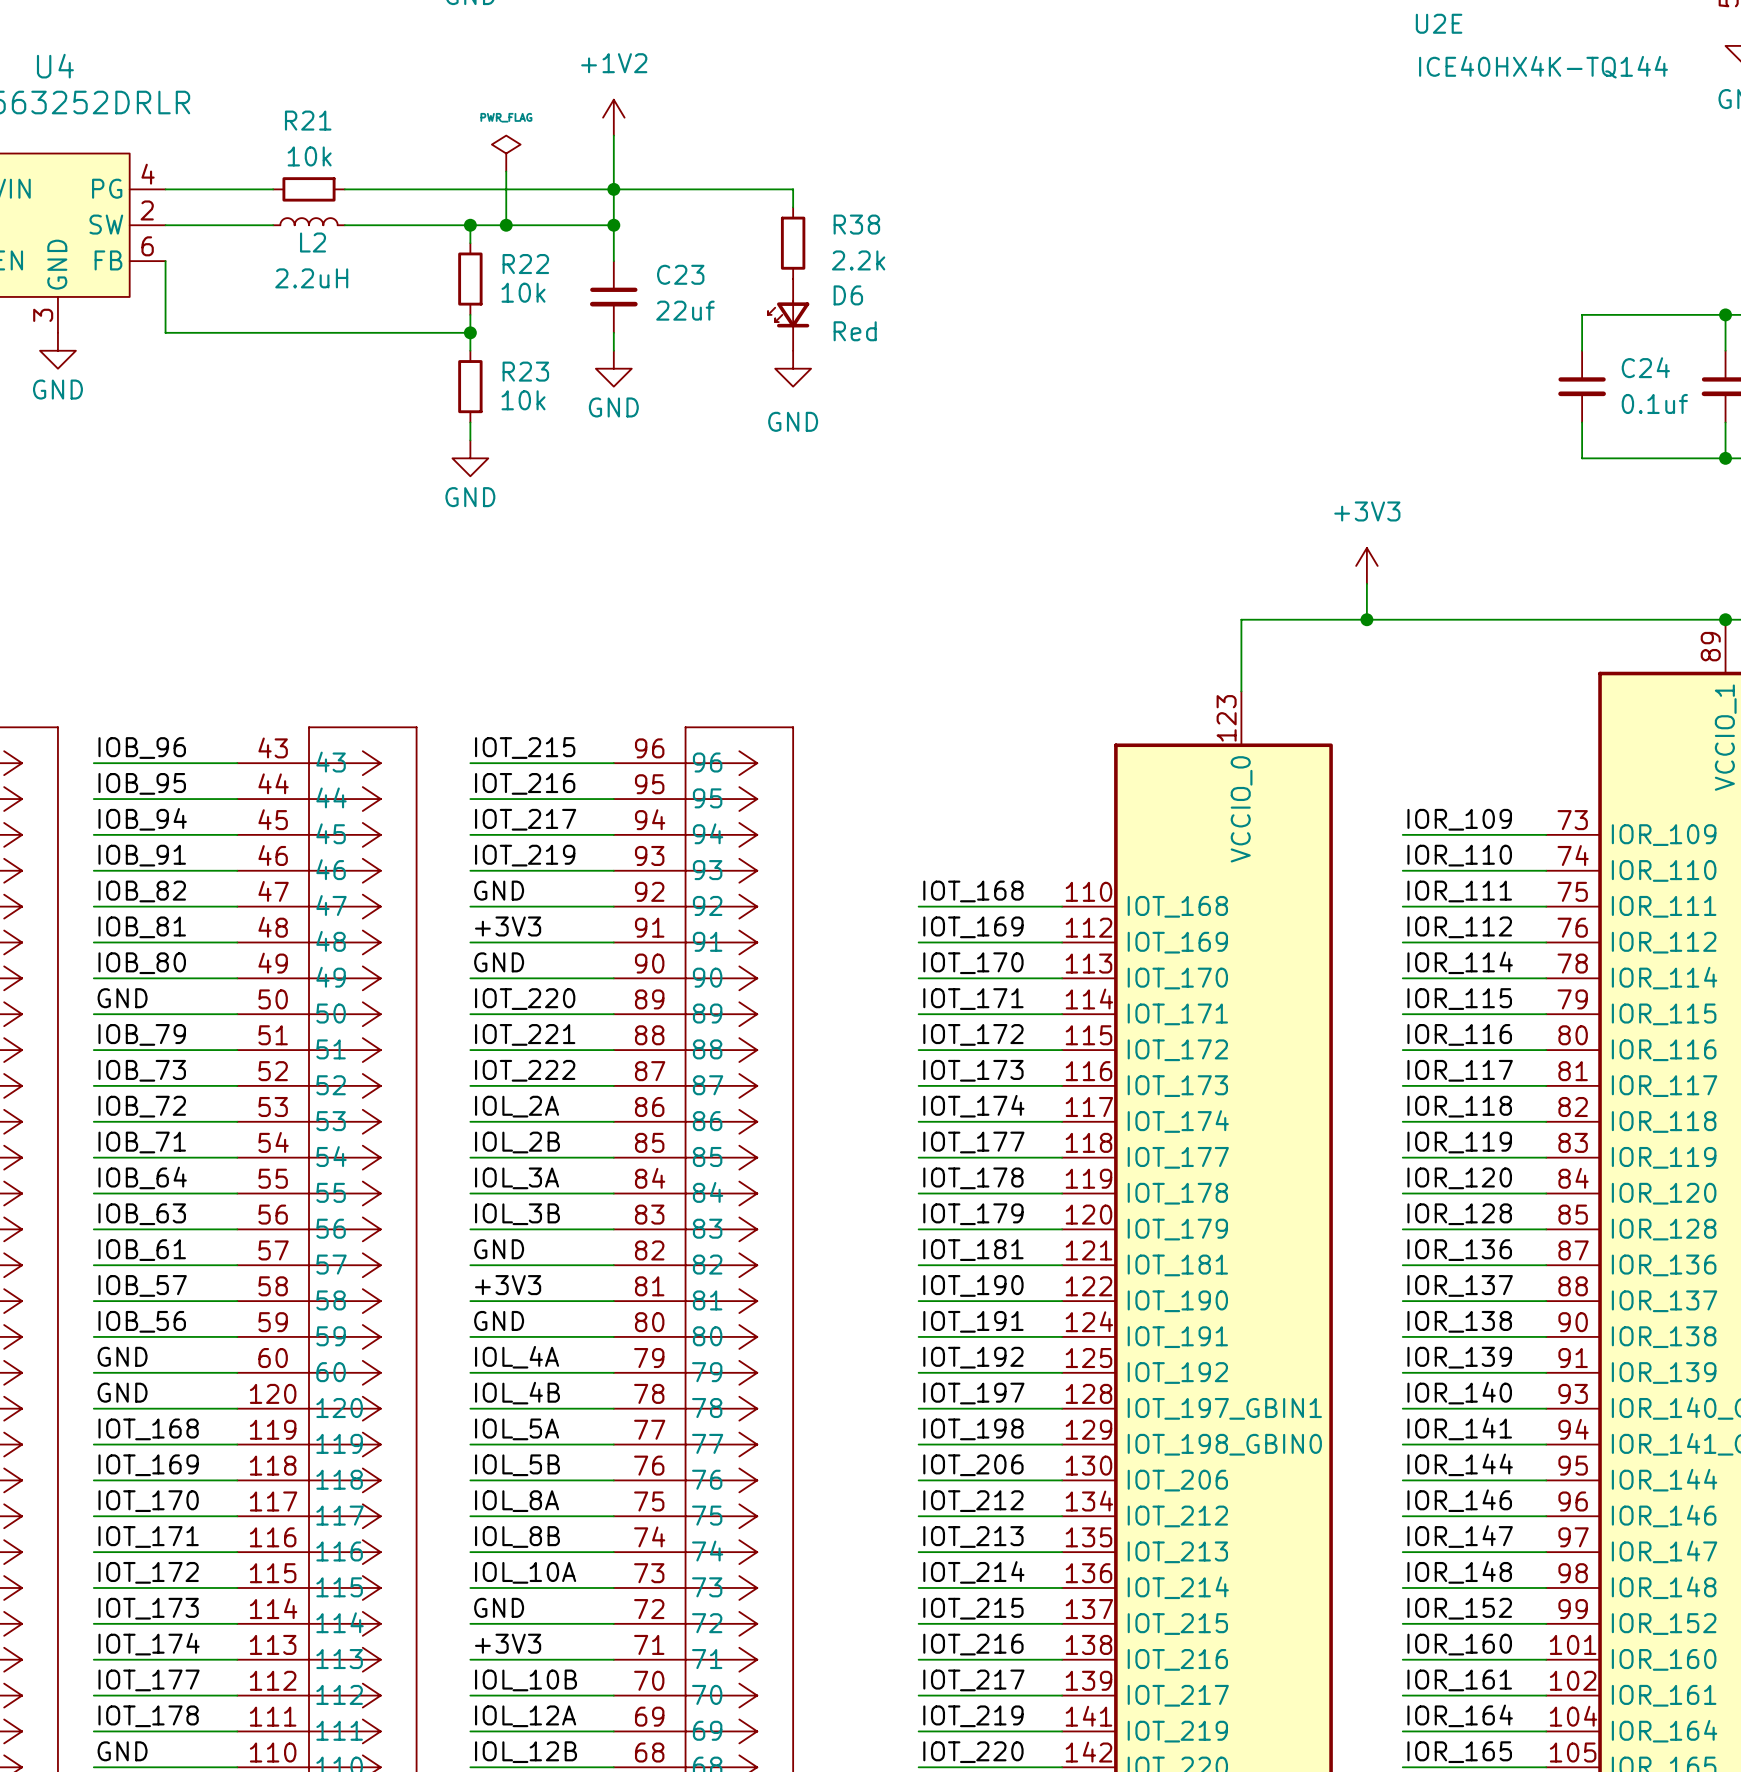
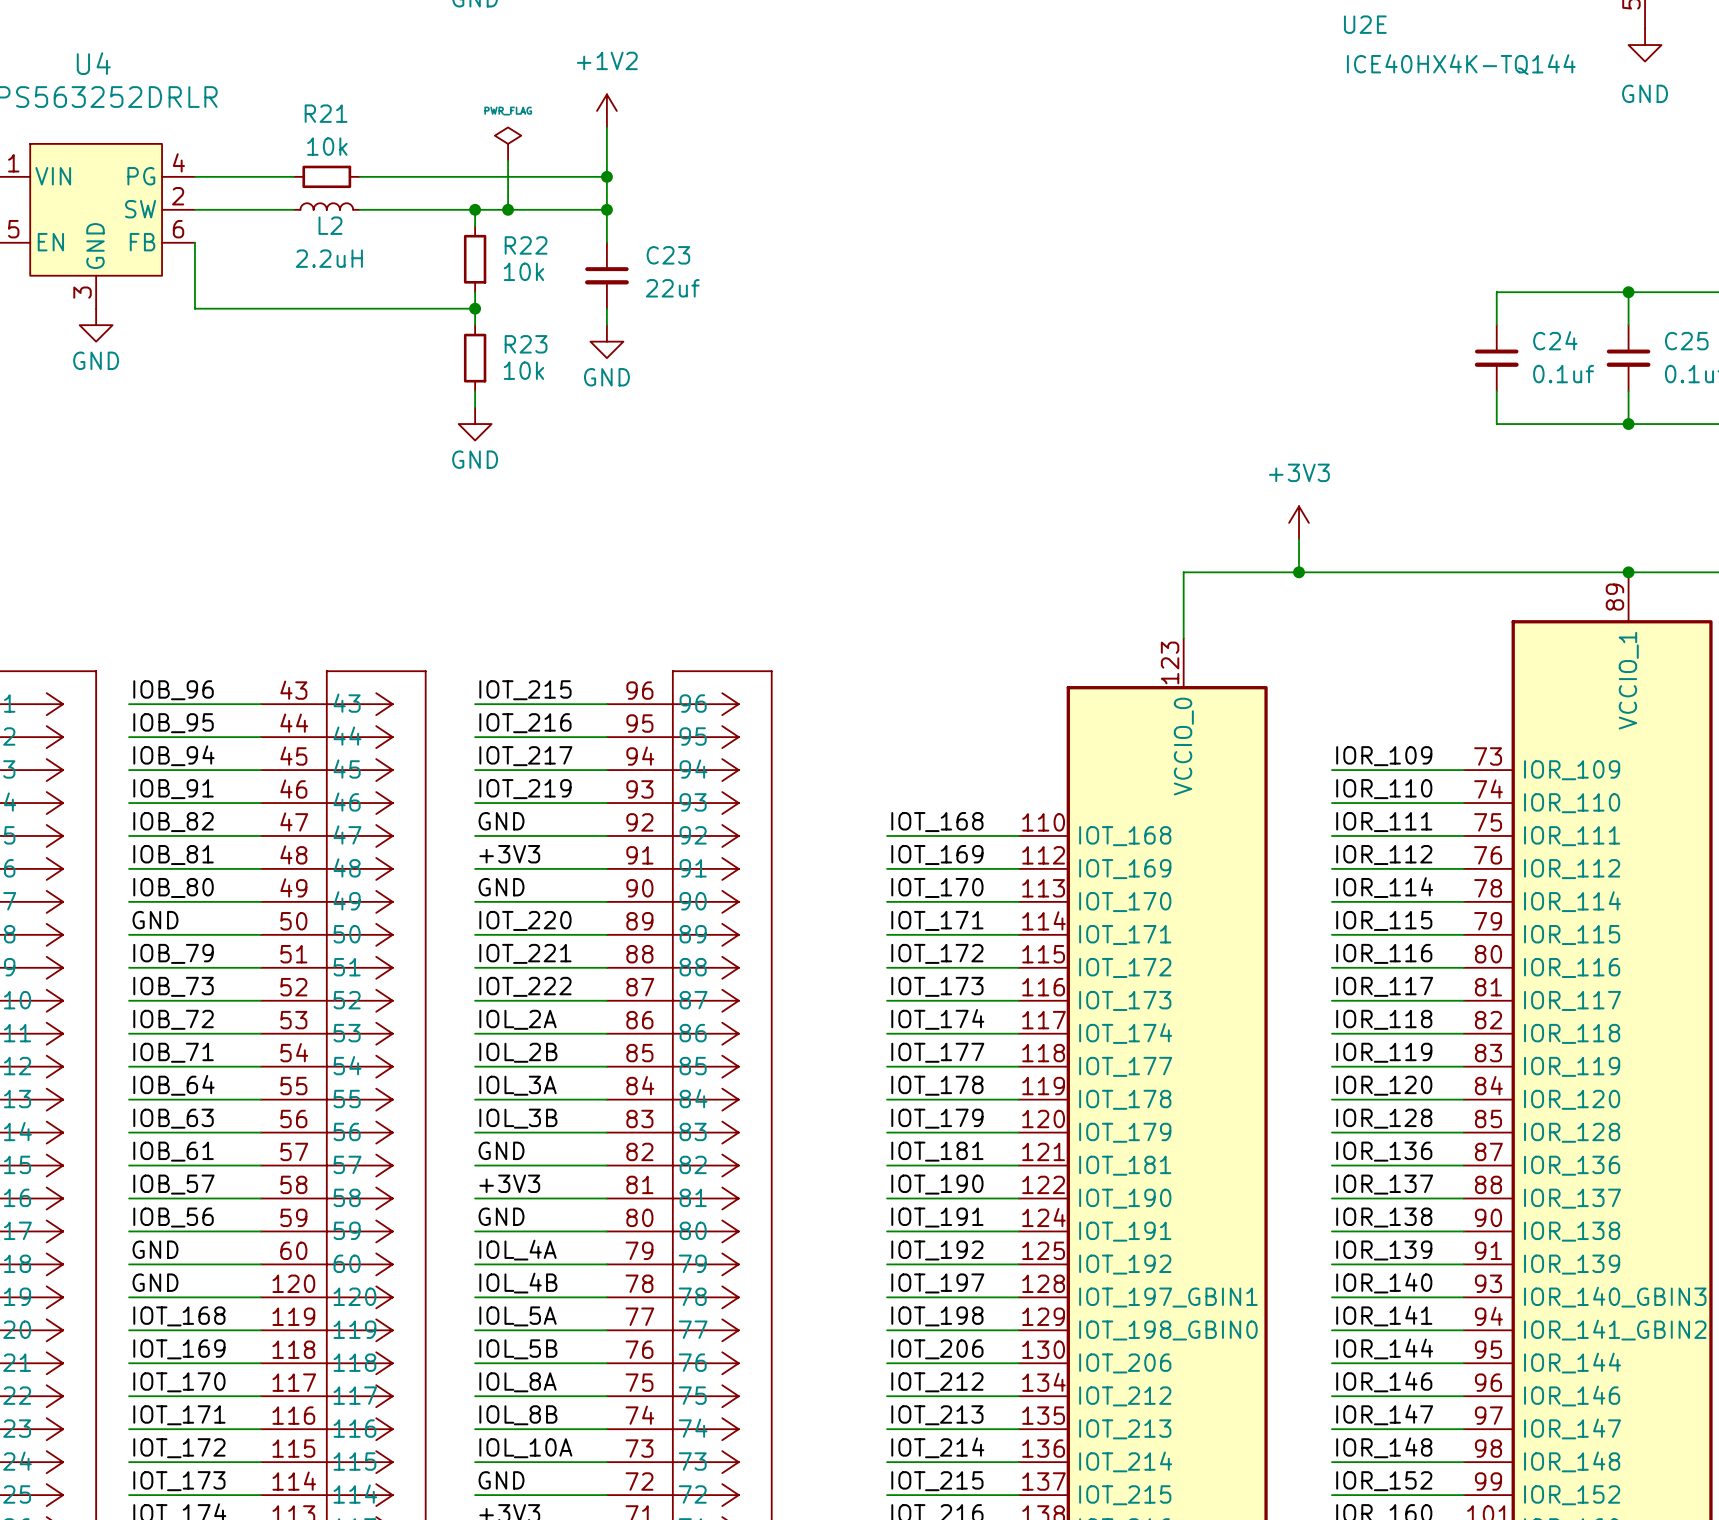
wire: (613, 189) (793, 189) (793, 207) -> none
R38: 2.2k (793, 243) -> none
D6: Red (788, 314) -> none
power symbol: GND (793, 368) -> none

